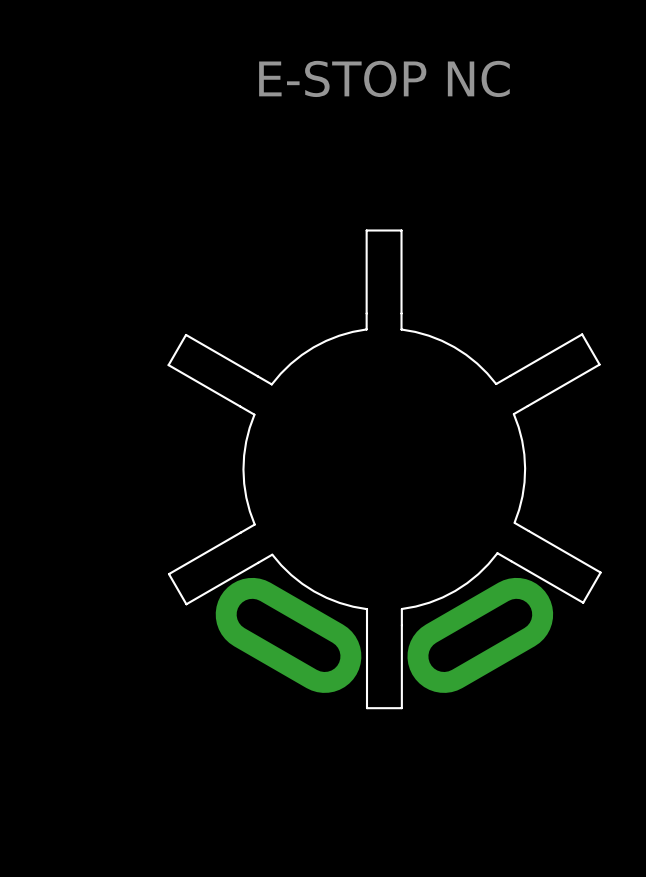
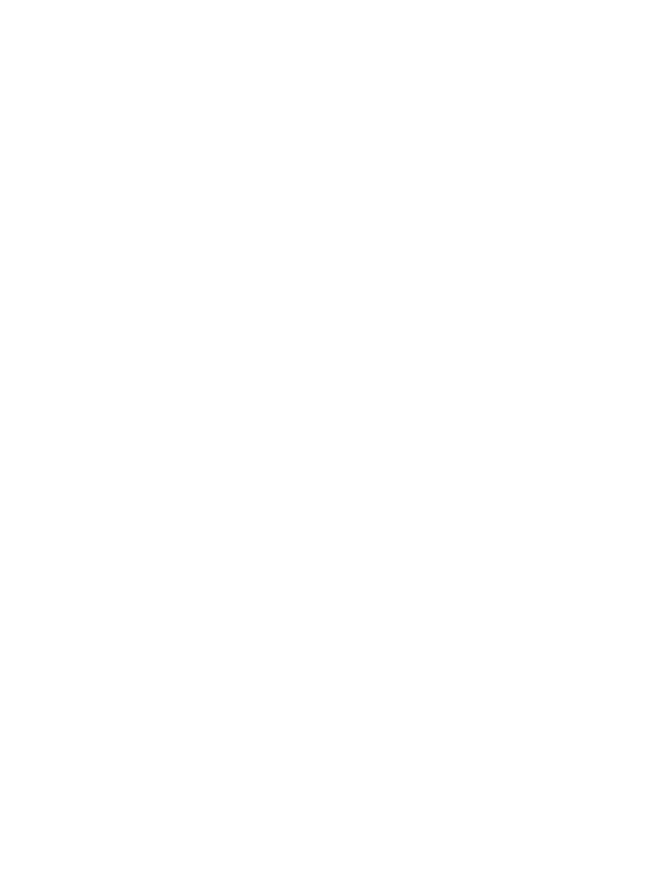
part: E-STOP NC (384, 469) -> none

